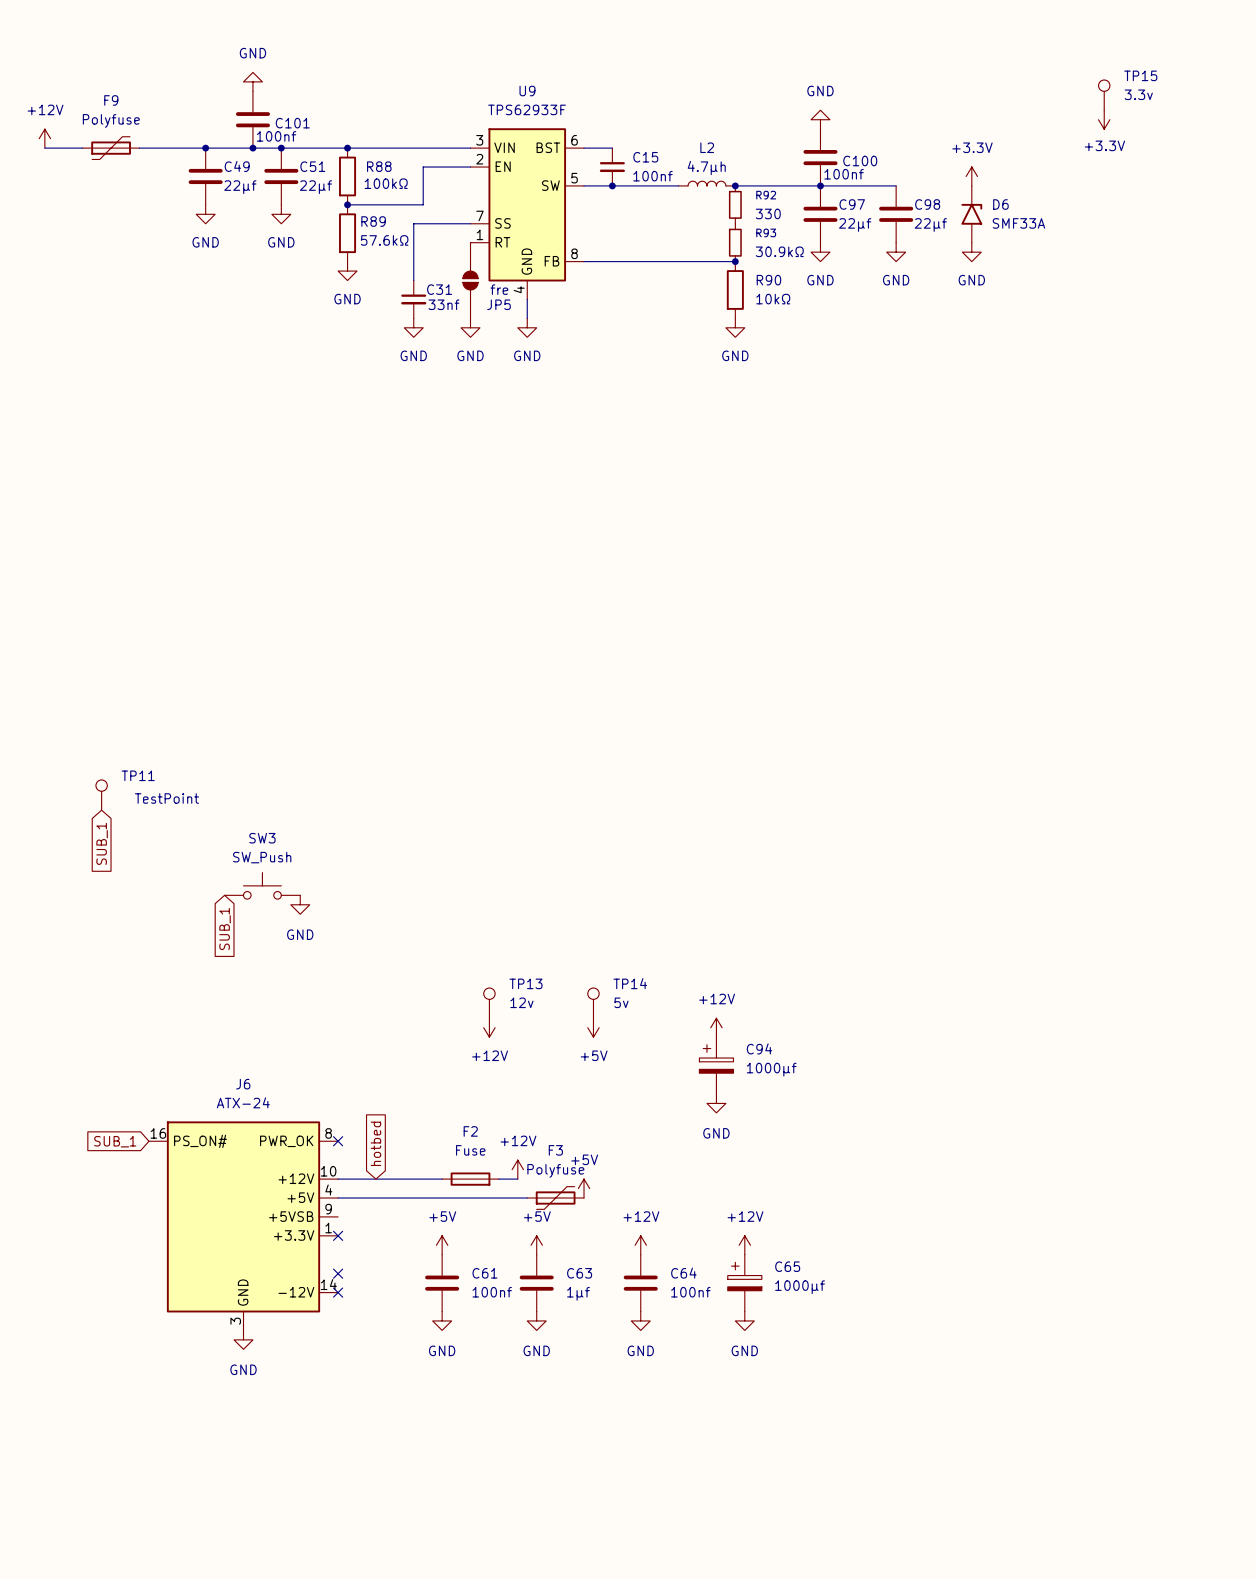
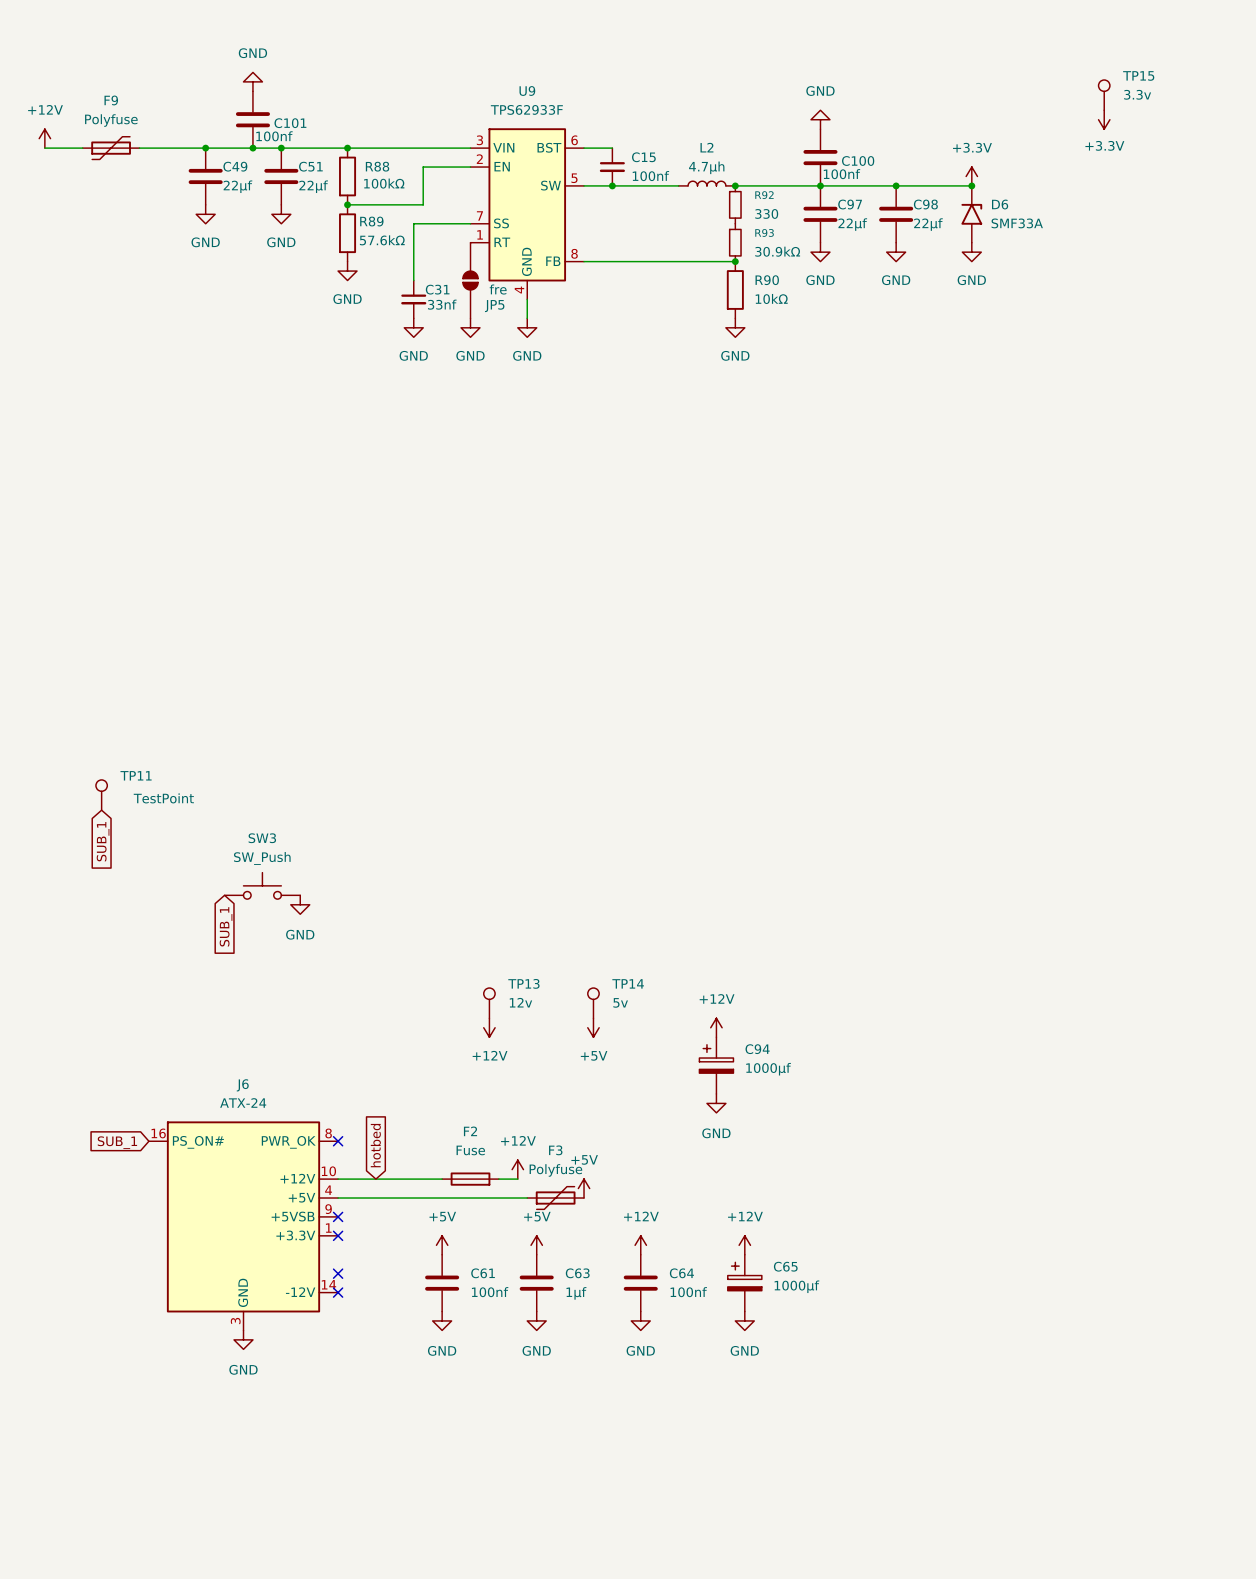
wire: none -> (896, 185) (971, 185)
junction: none -> (896, 185)
junction: none -> (971, 185)
no-connect mark: none -> (338, 1216)

